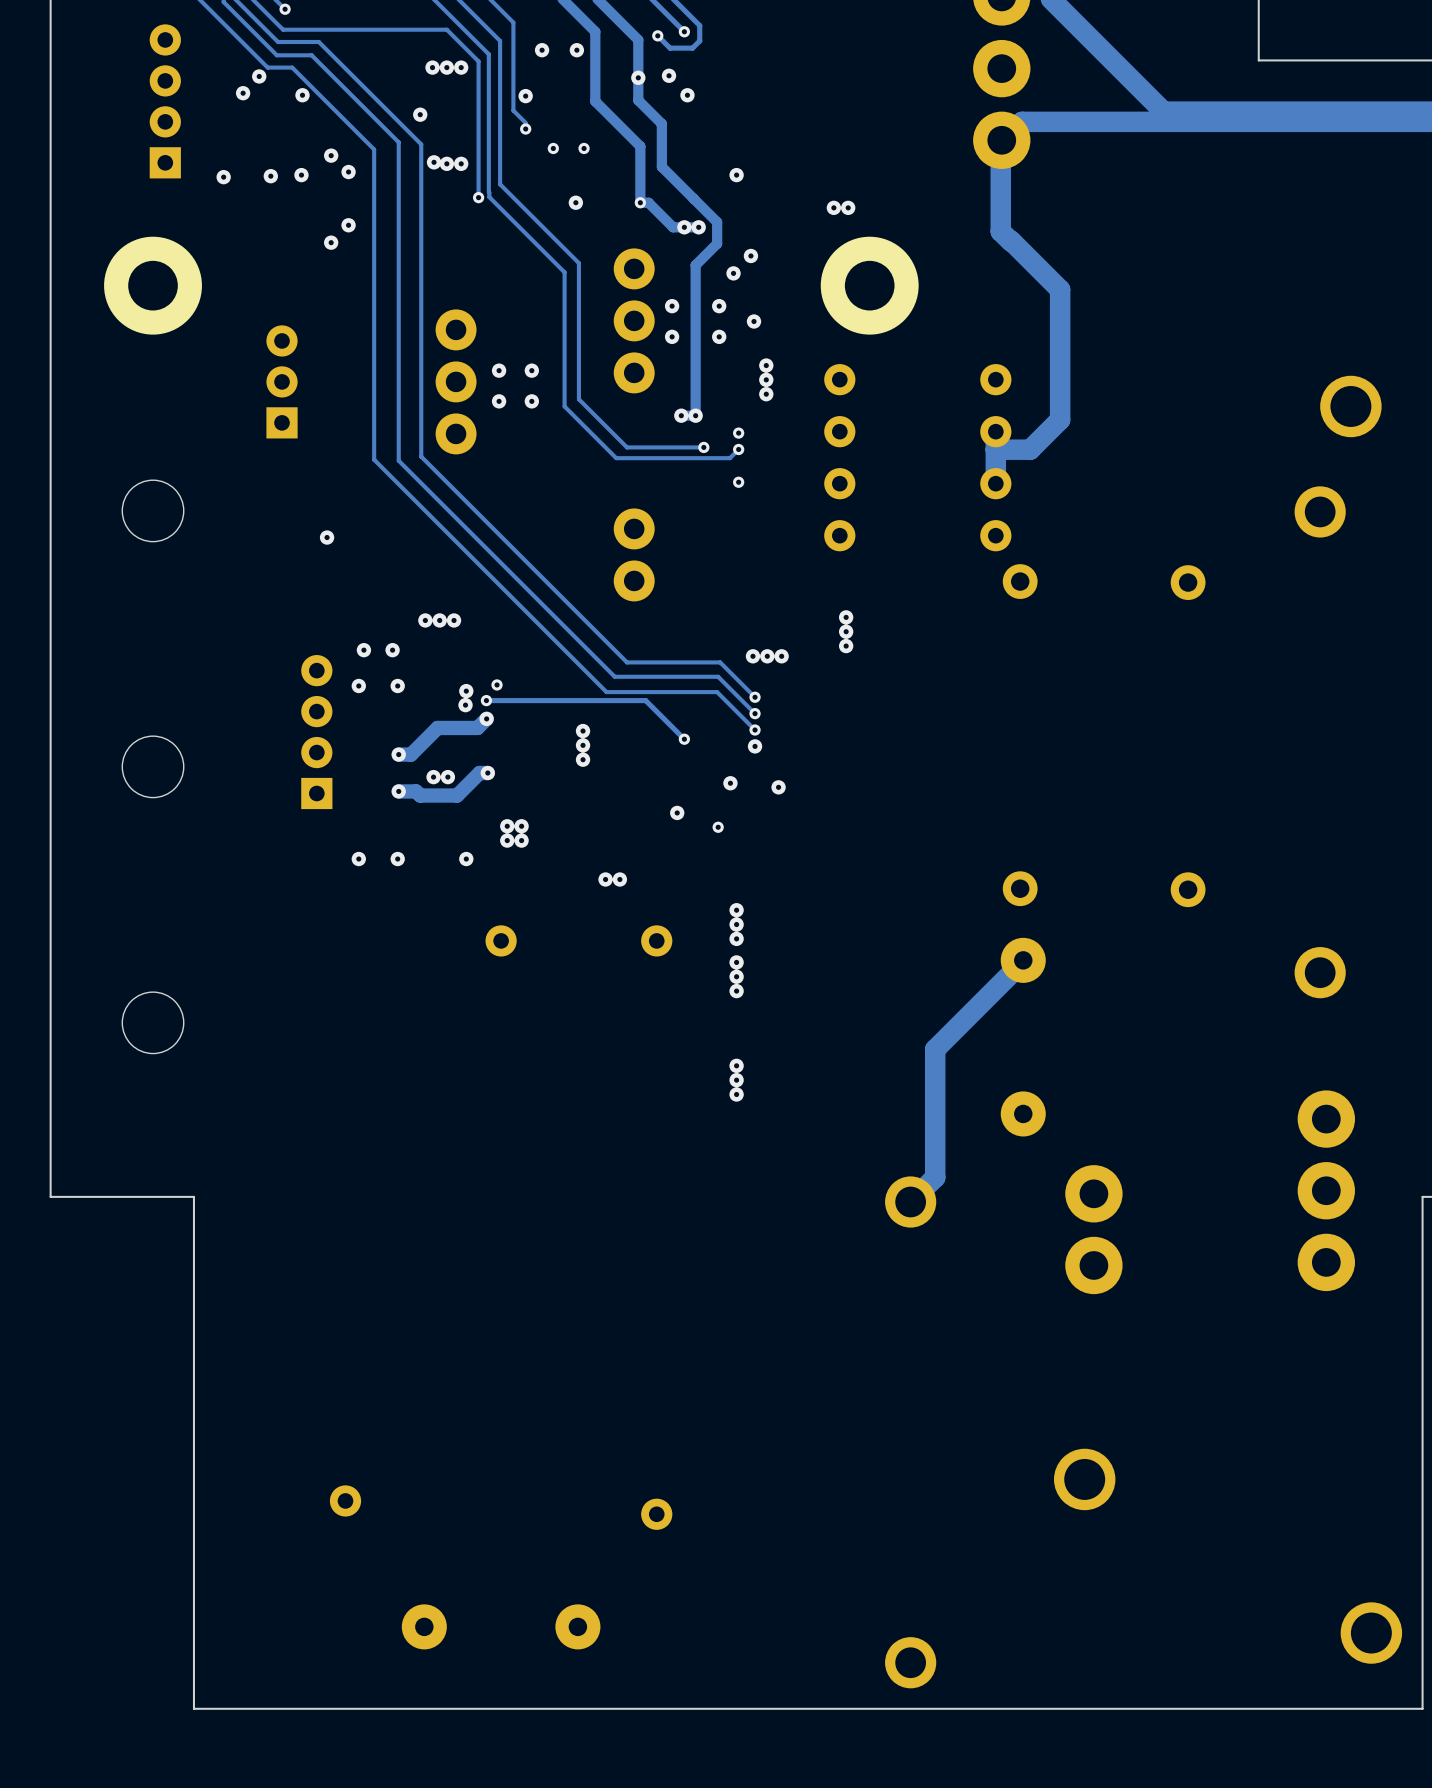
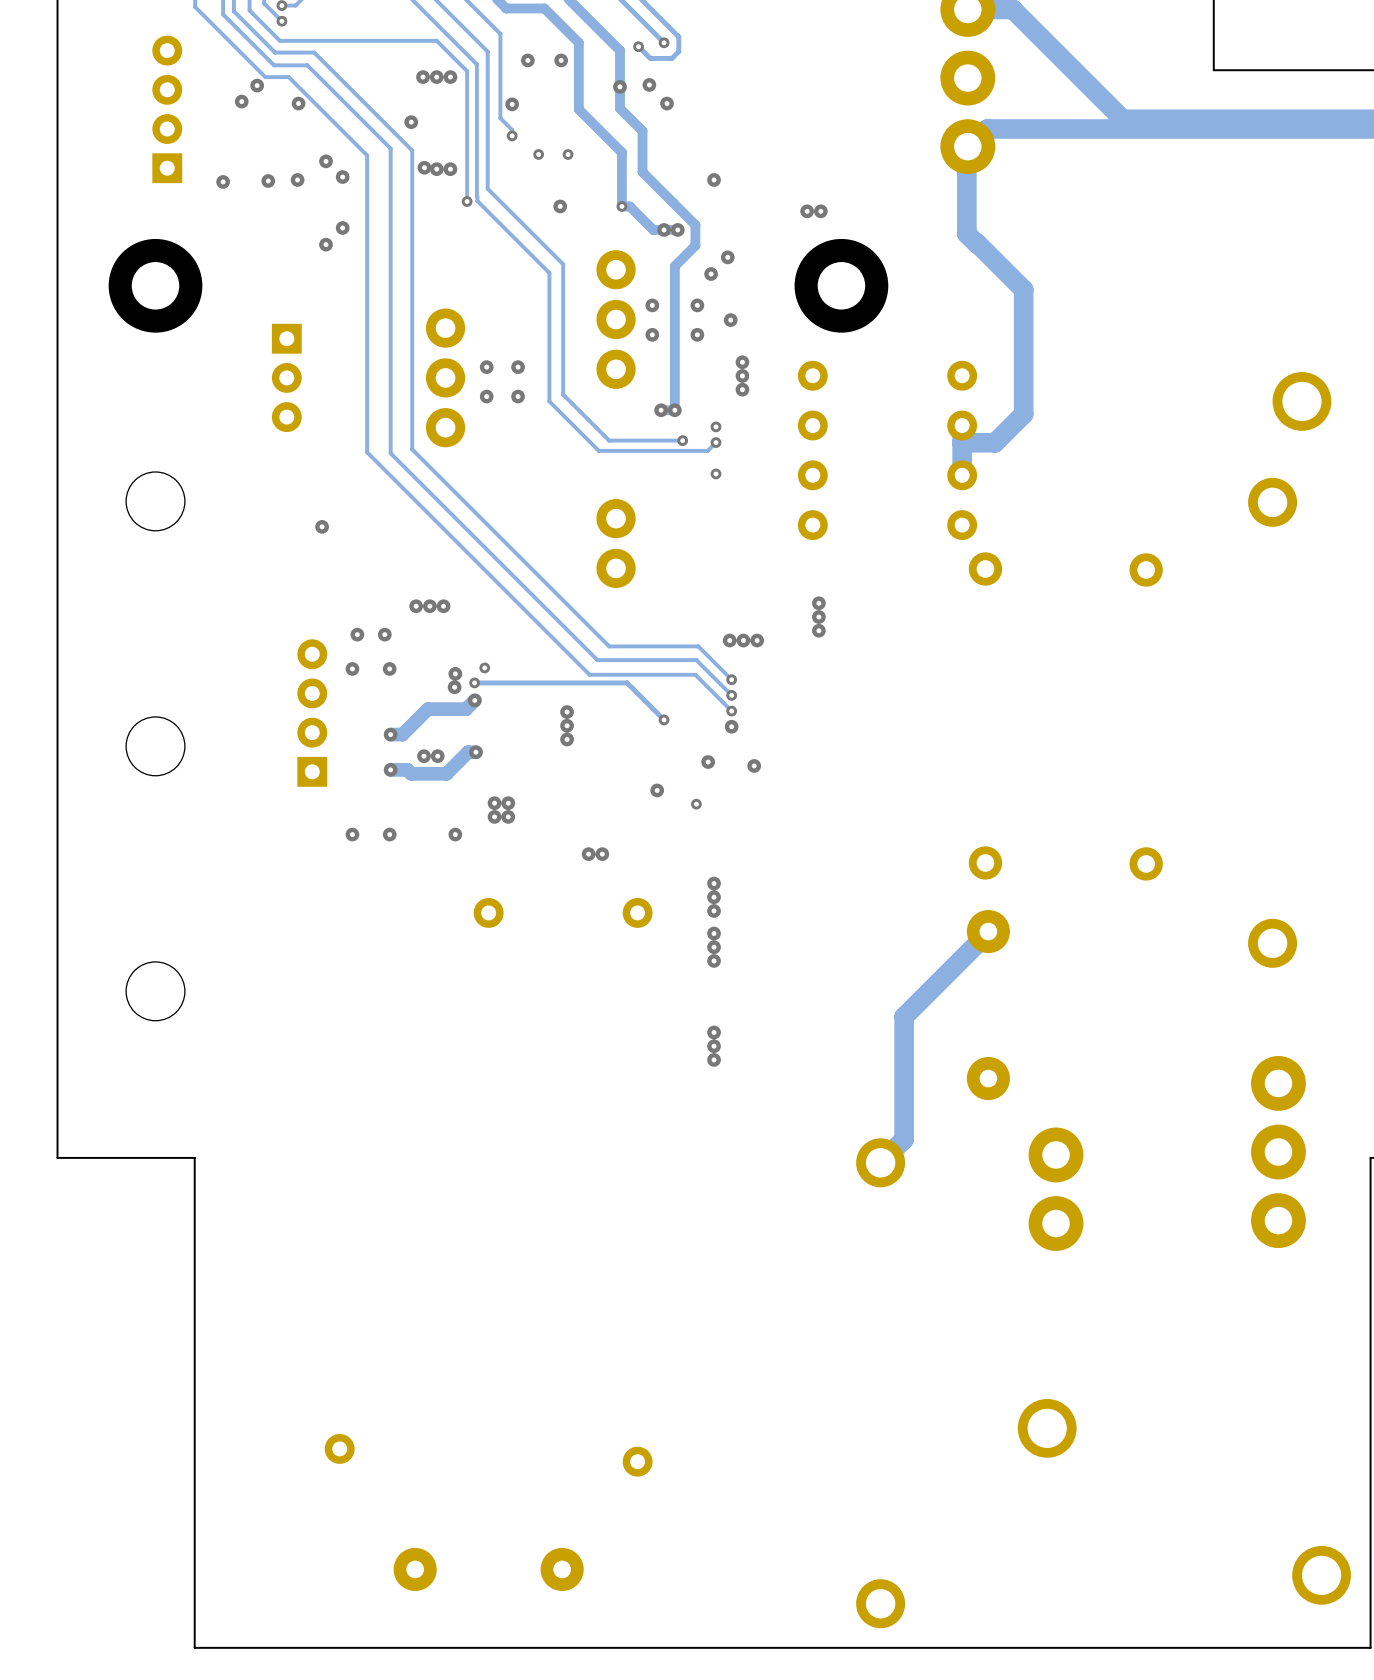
part rotation: 0° (282, 381) -> 180° (286, 377)

